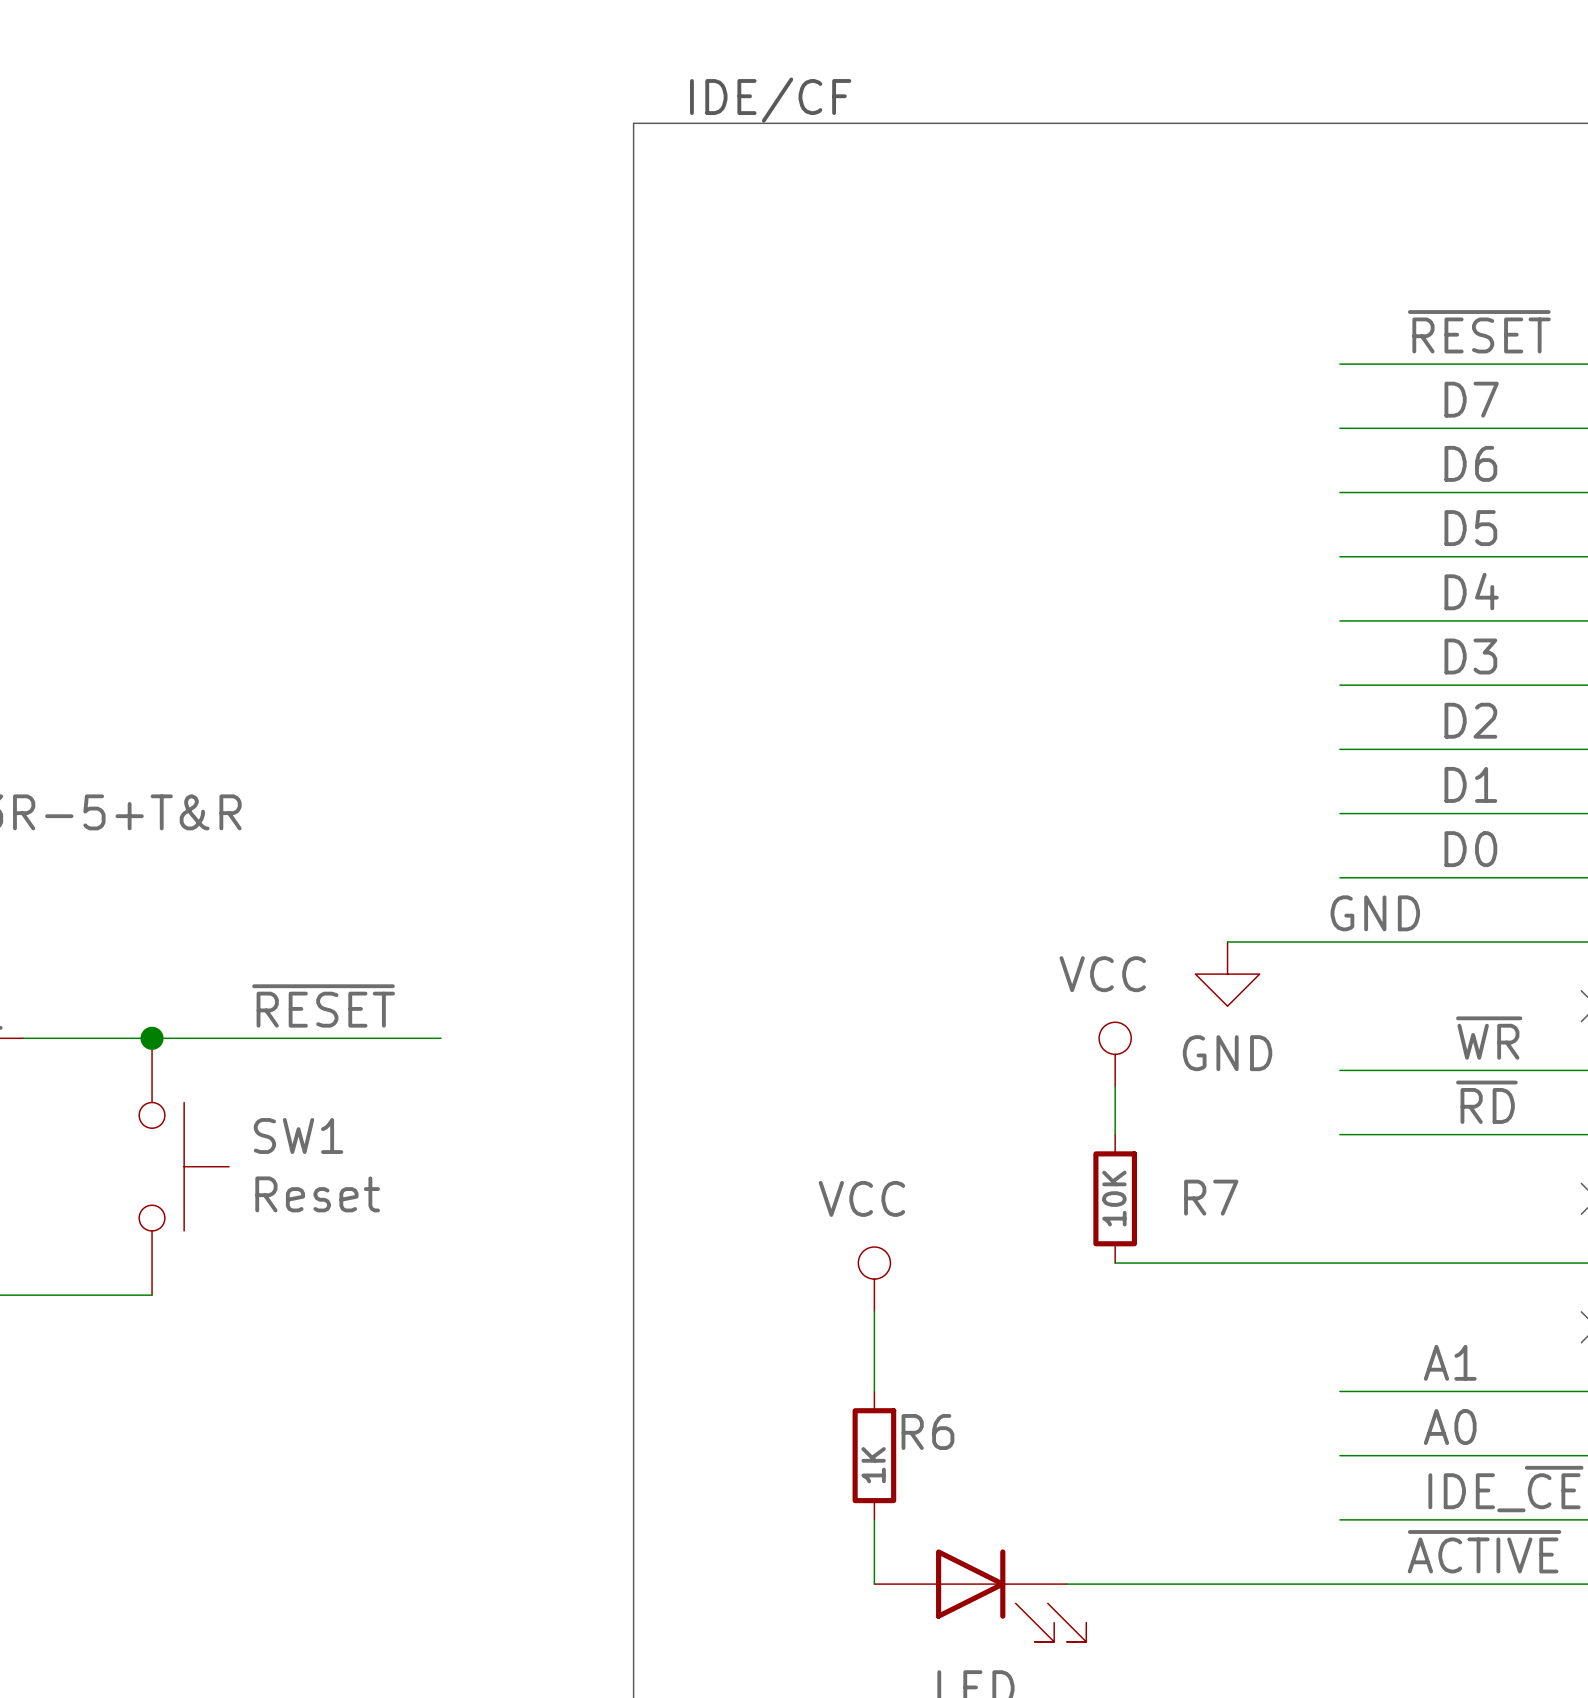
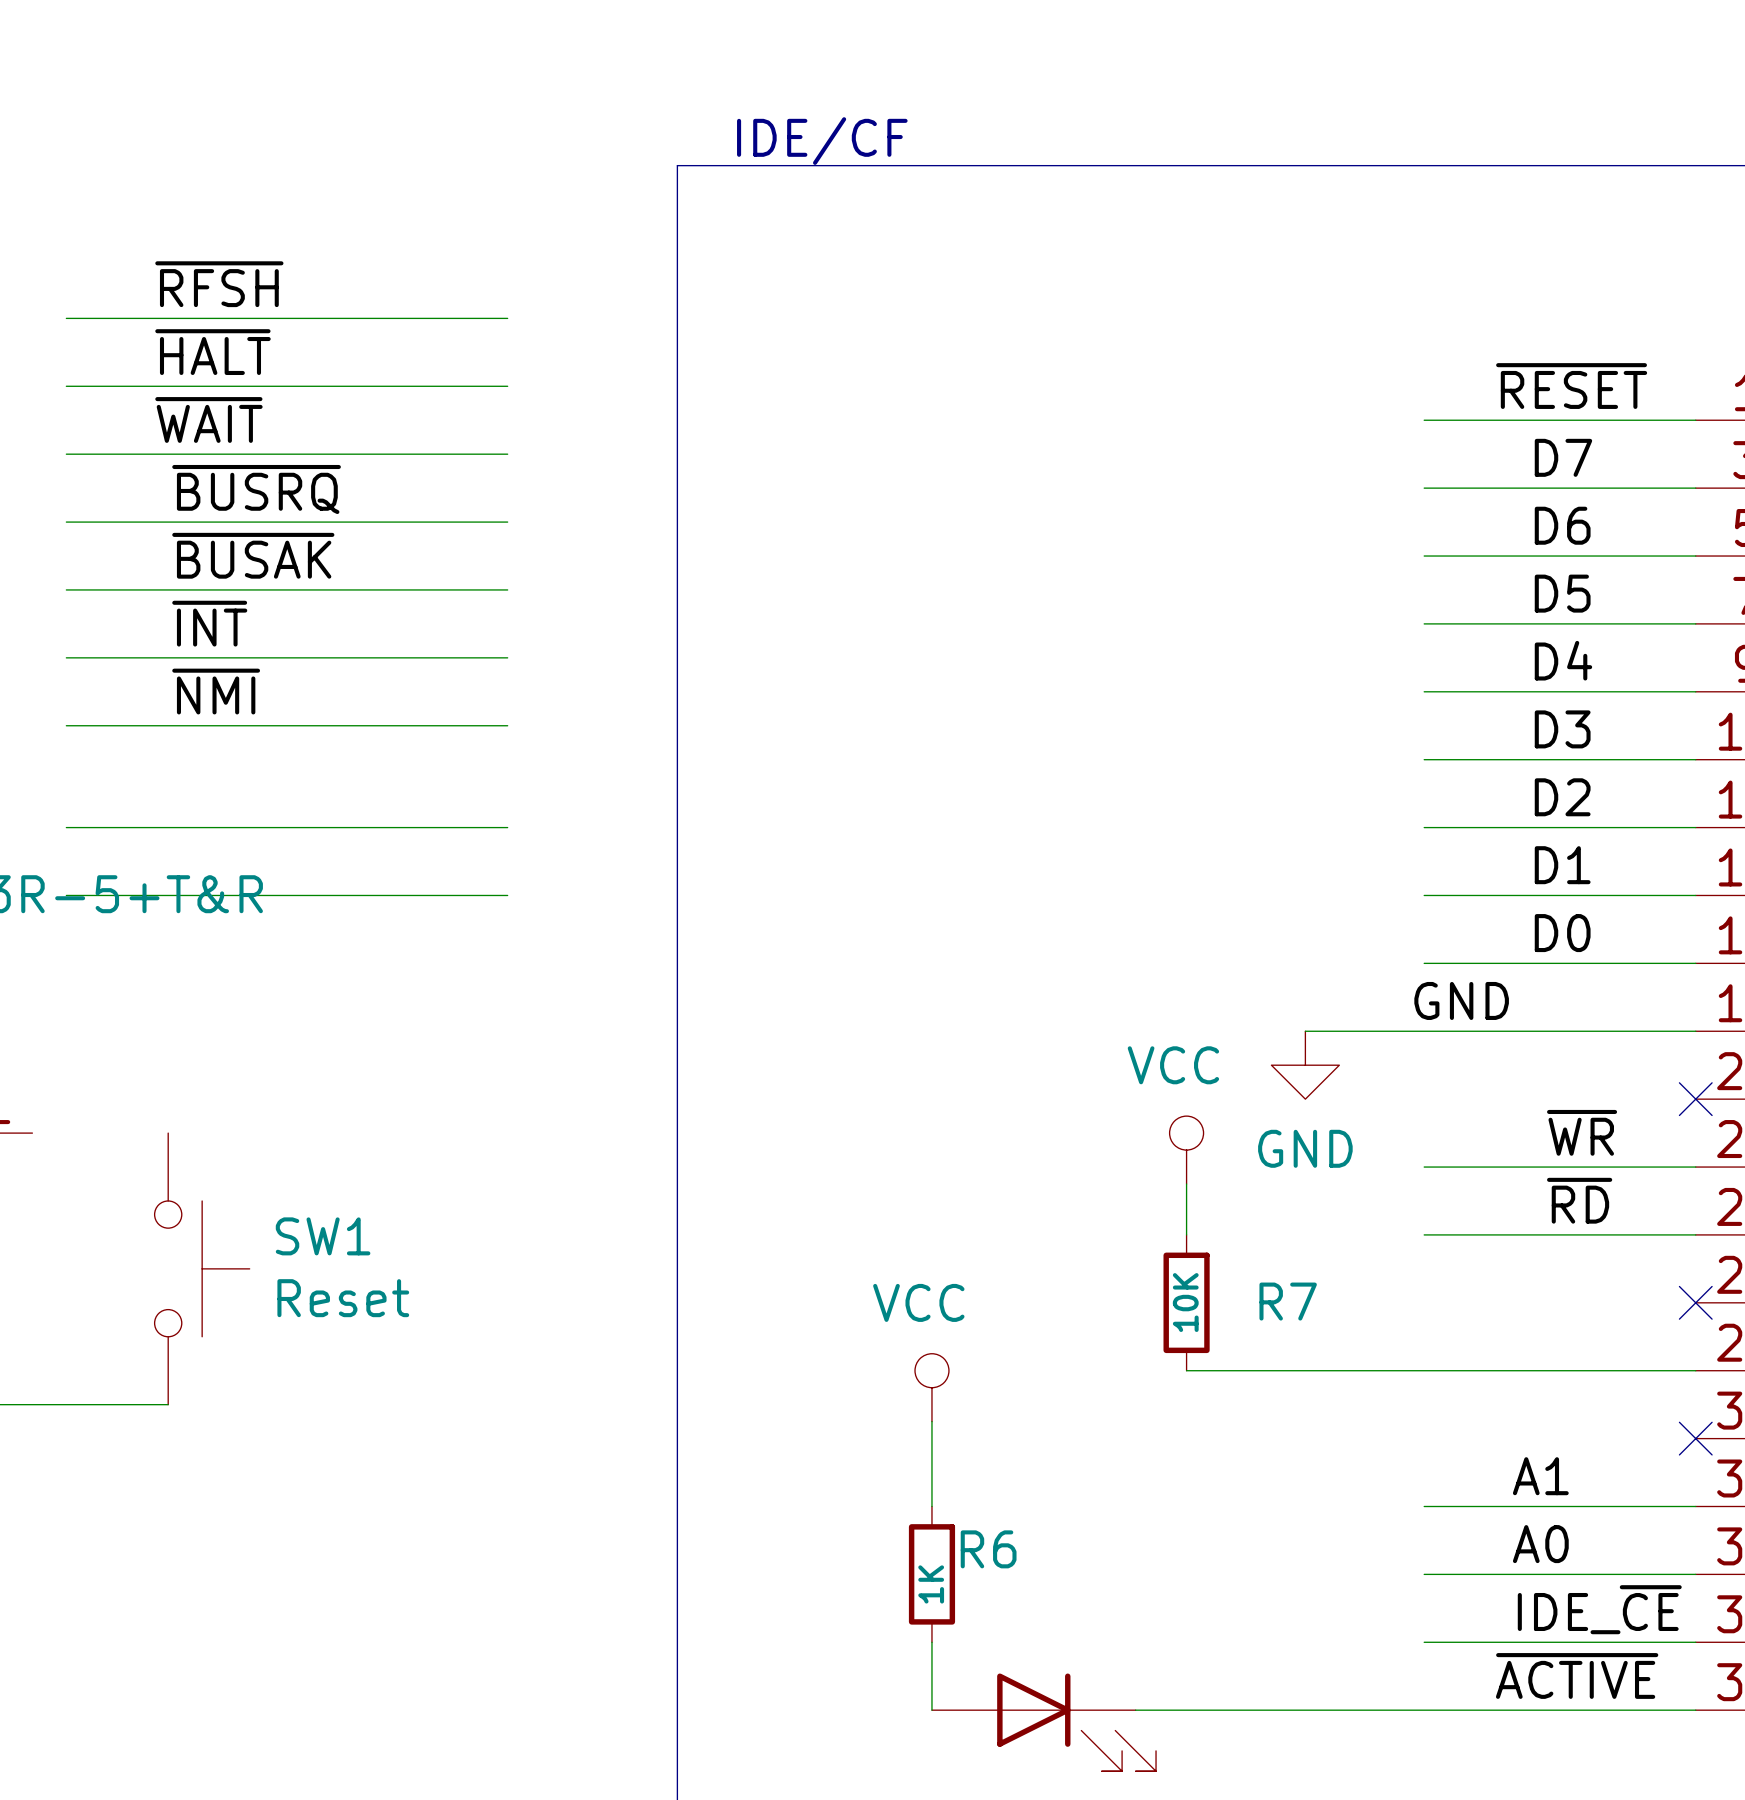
label: none -> ~{RFSH} (219, 284)
wire: none -> (66, 318) (507, 318)
label: none -> ~{HALT} (212, 352)
wire: none -> (66, 386) (507, 386)
label: none -> ~{WAIT} (208, 419)
wire: none -> (66, 454) (507, 454)
label: none -> ~{BUSRQ} (256, 489)
wire: none -> (66, 522) (507, 522)
label: none -> ~{BUSAK} (253, 555)
wire: none -> (66, 589) (507, 589)
label: none -> ~{INT} (209, 623)
wire: none -> (66, 657) (507, 657)
label: none -> ~{NMI} (216, 691)
wire: none -> (66, 725) (507, 725)
wire: none -> (66, 827) (507, 827)
label: ~{RESET} (323, 1005) -> none
wire: (23, 1038) (440, 1038) -> (66, 895) (507, 895)
junction: (152, 1038) -> none

